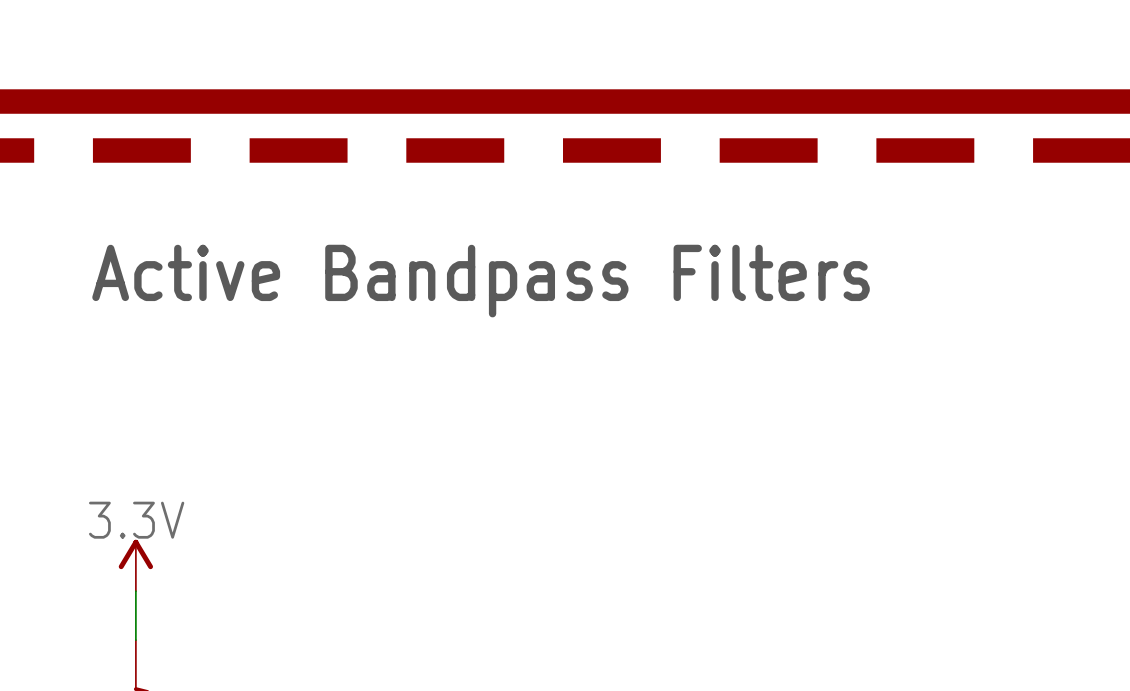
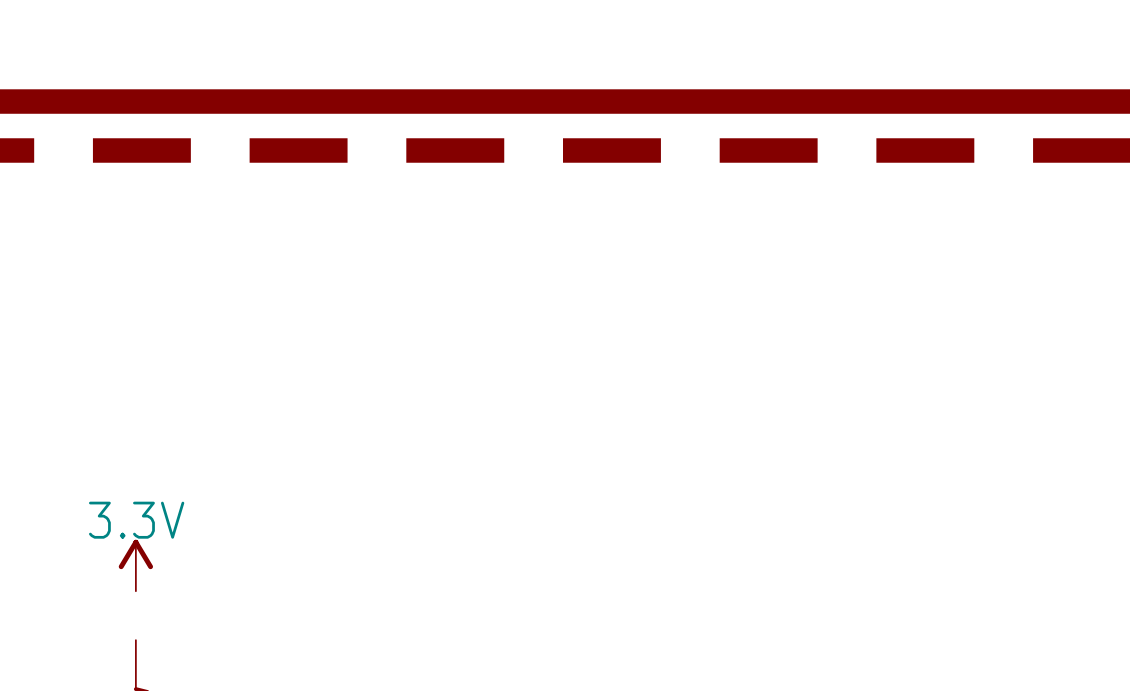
text: Active Bandpass Filters (481, 281) -> none
wire: (135, 591) (135, 640) -> none

